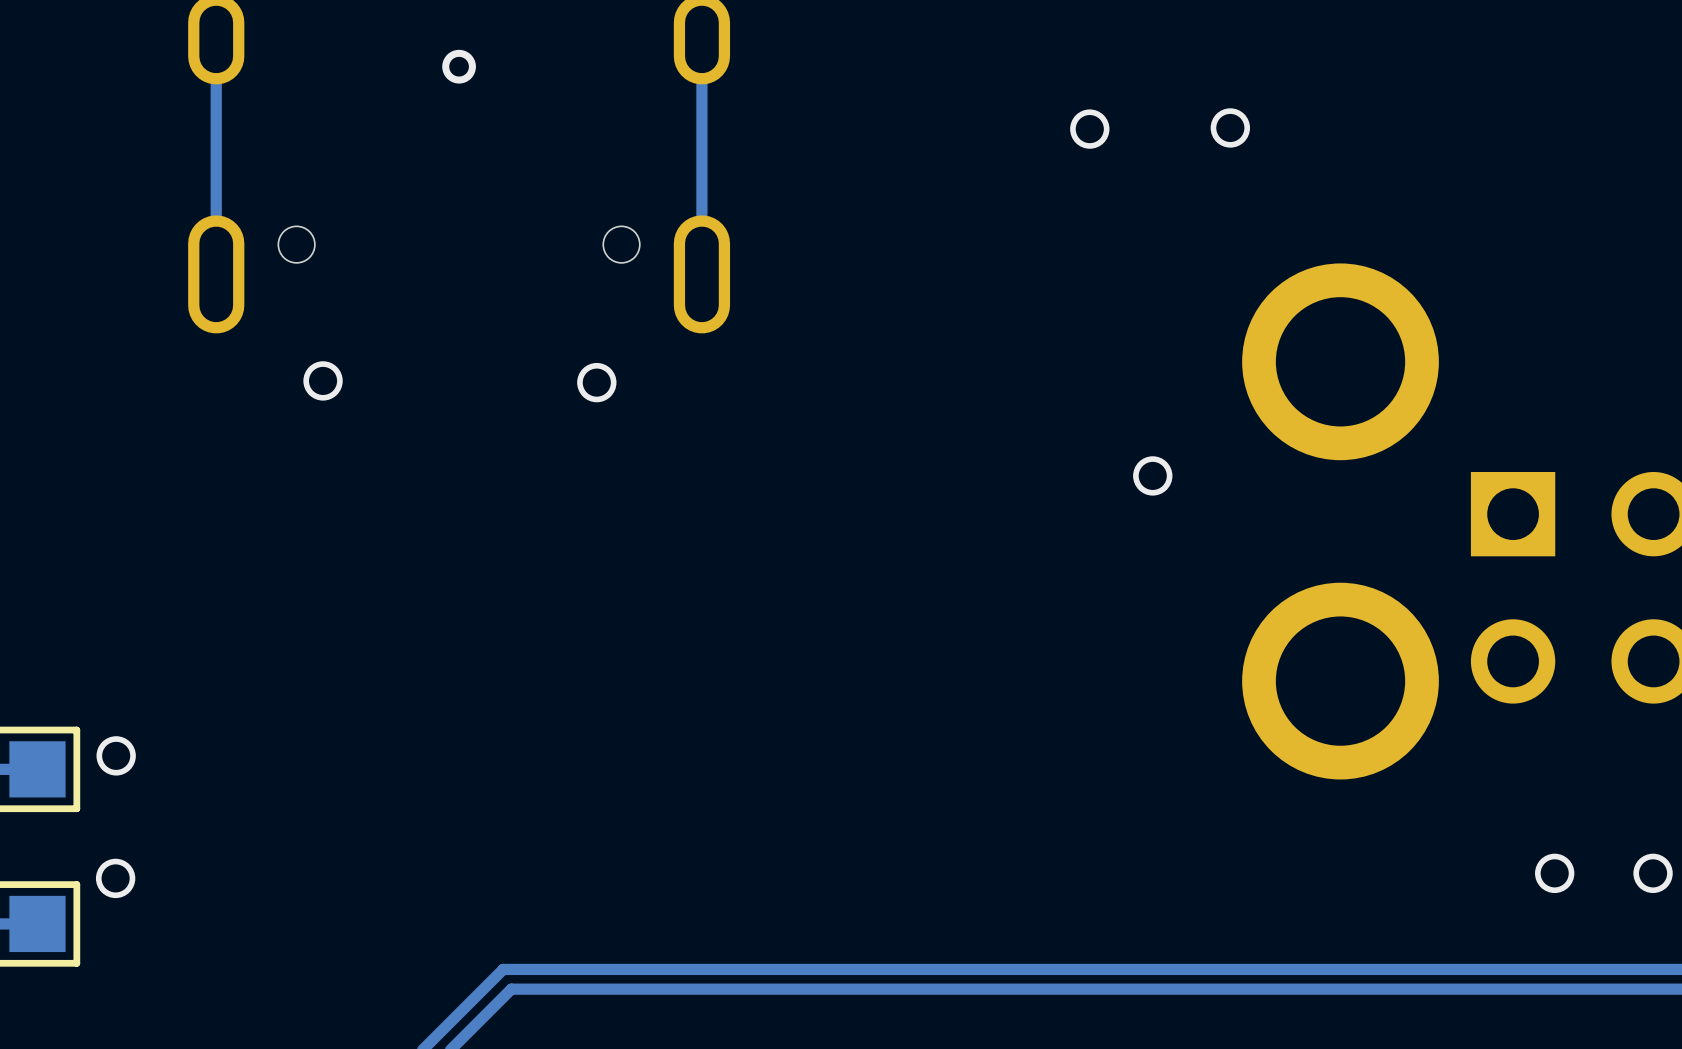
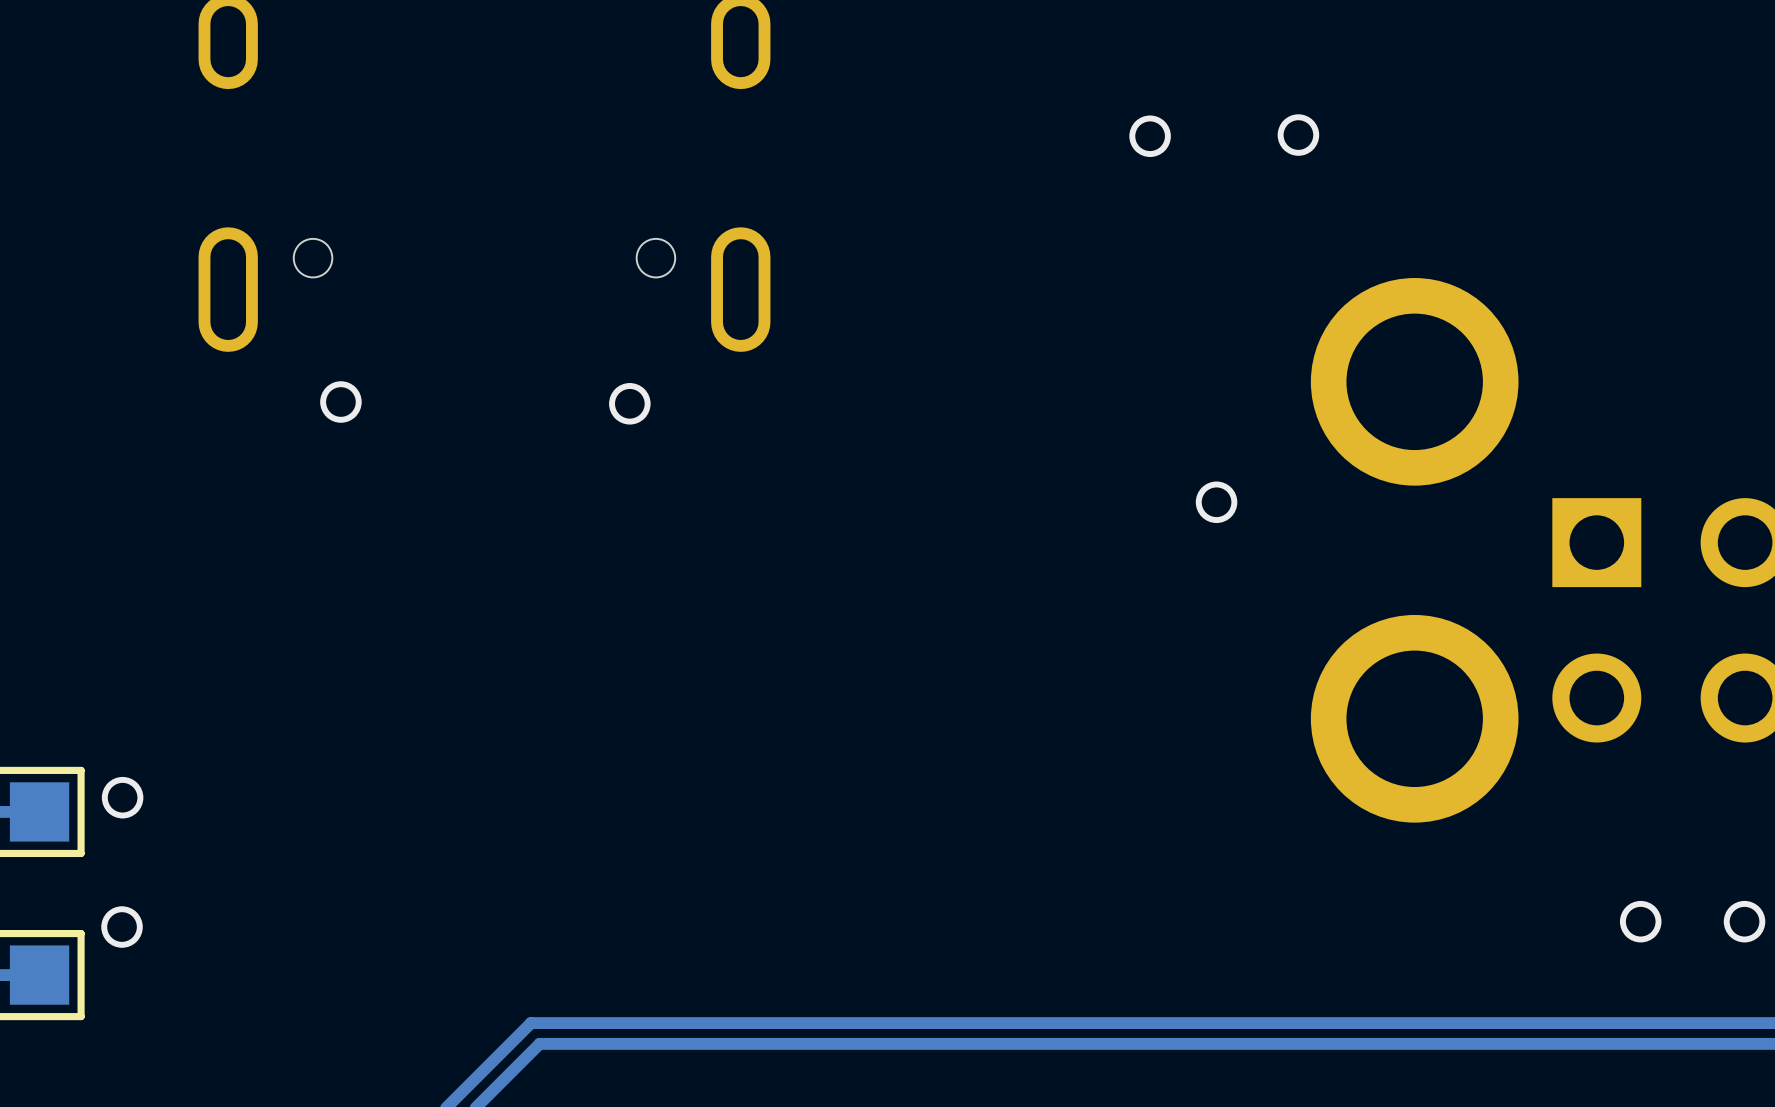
track: (216, 39) (216, 274) -> none
track: (701, 39) (701, 274) -> none
via: (459, 66) -> none

